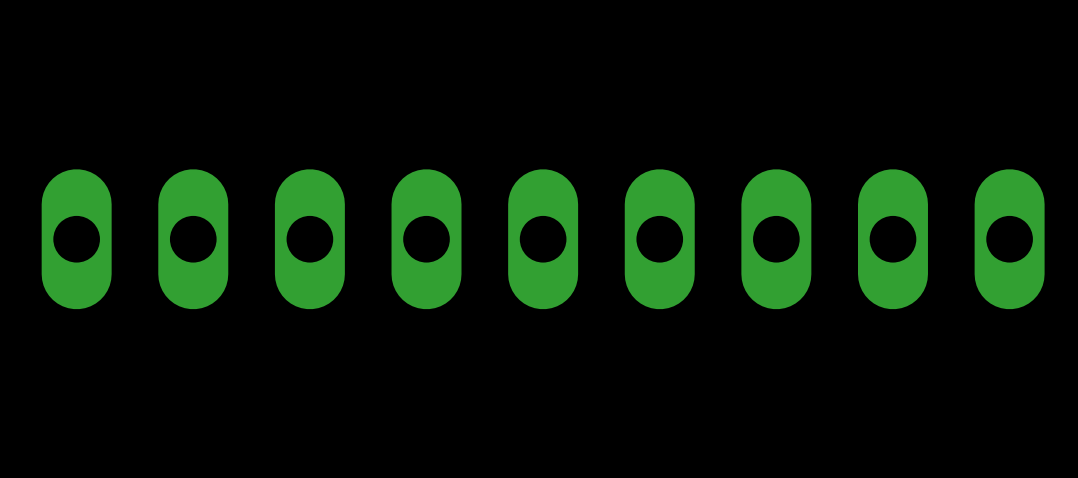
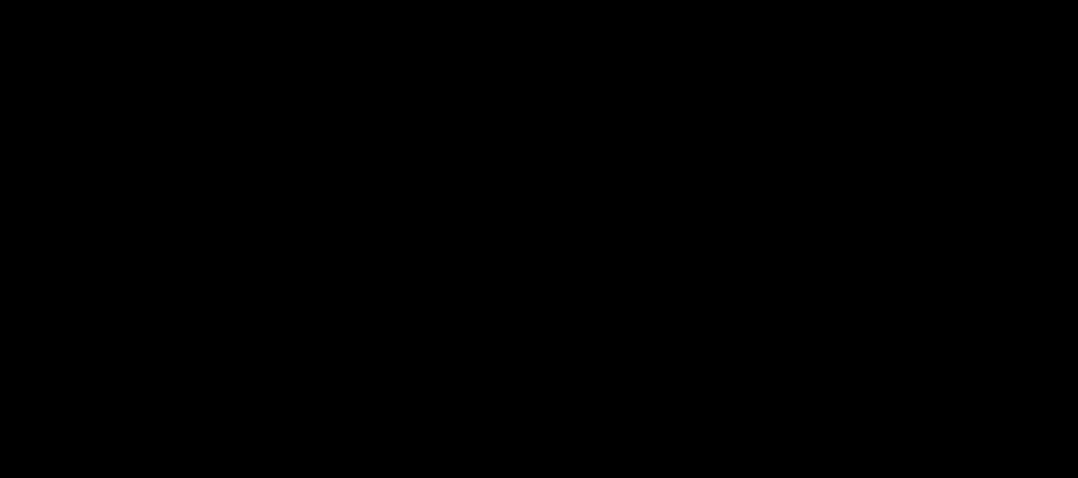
part: (543, 239) -> none

